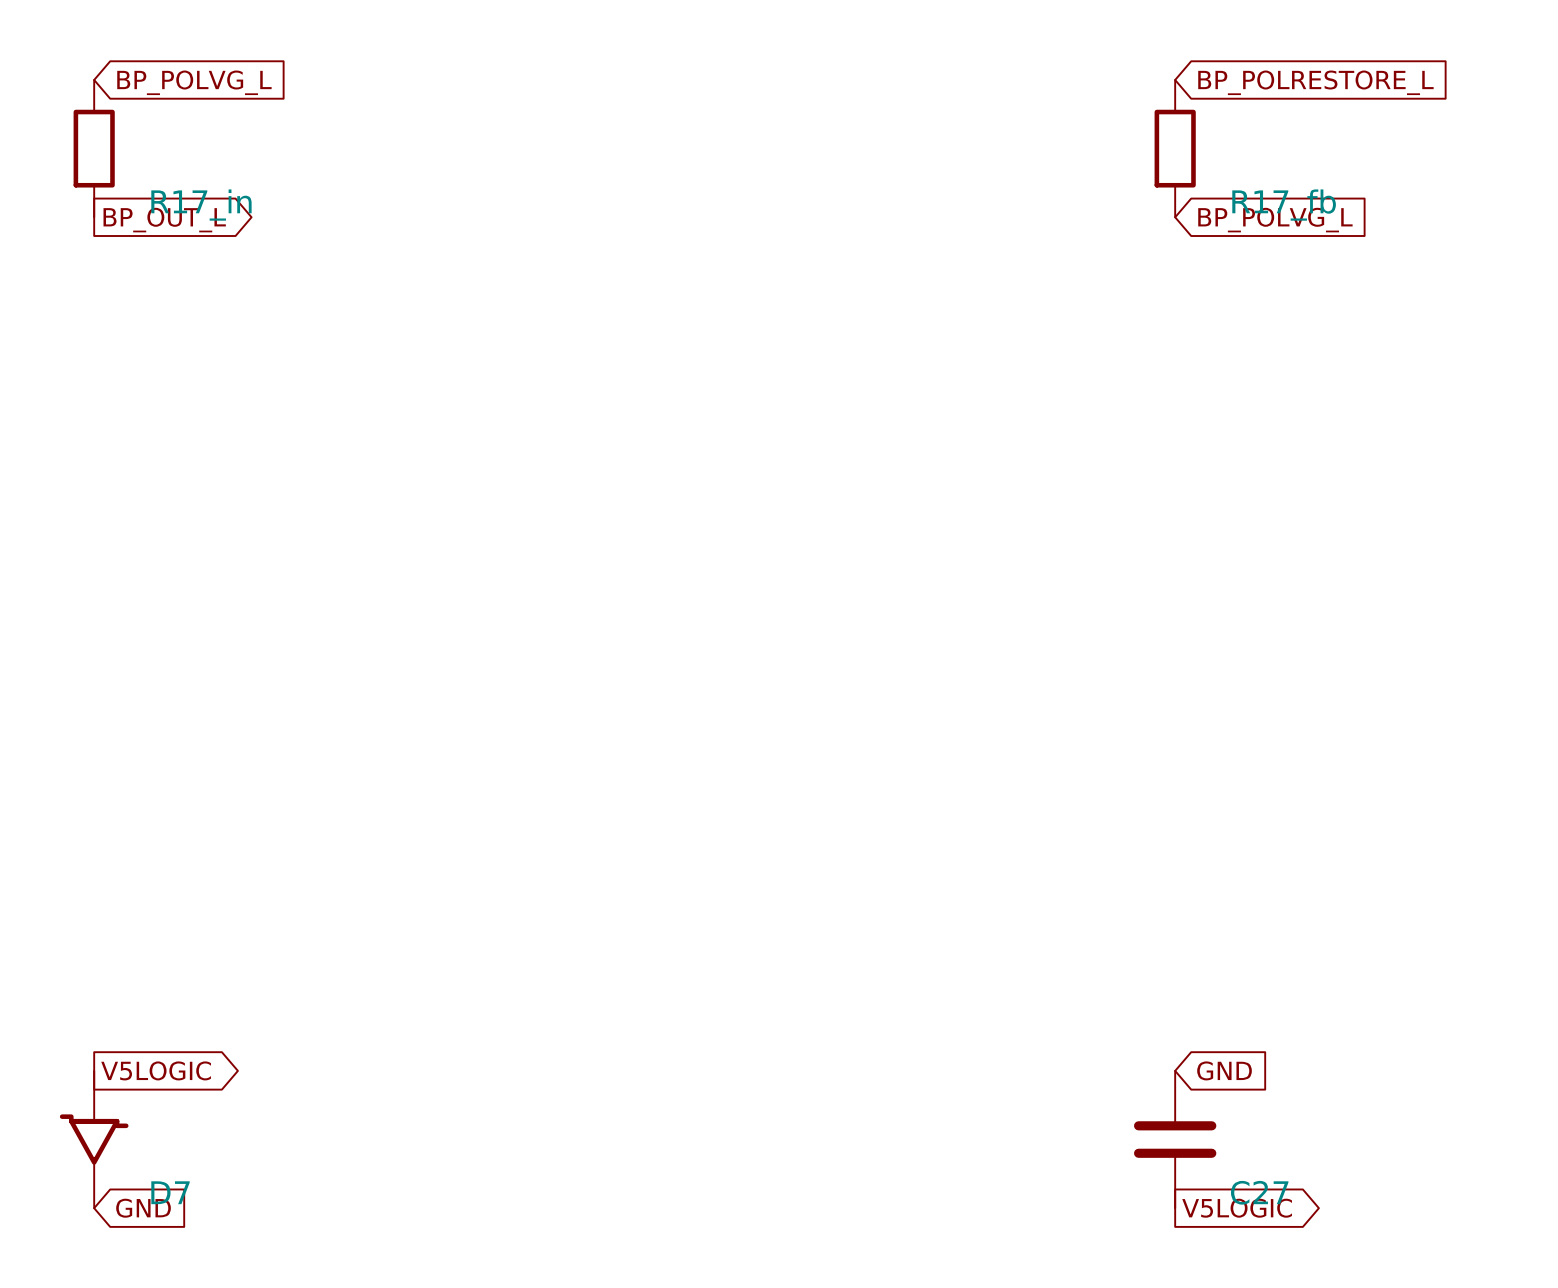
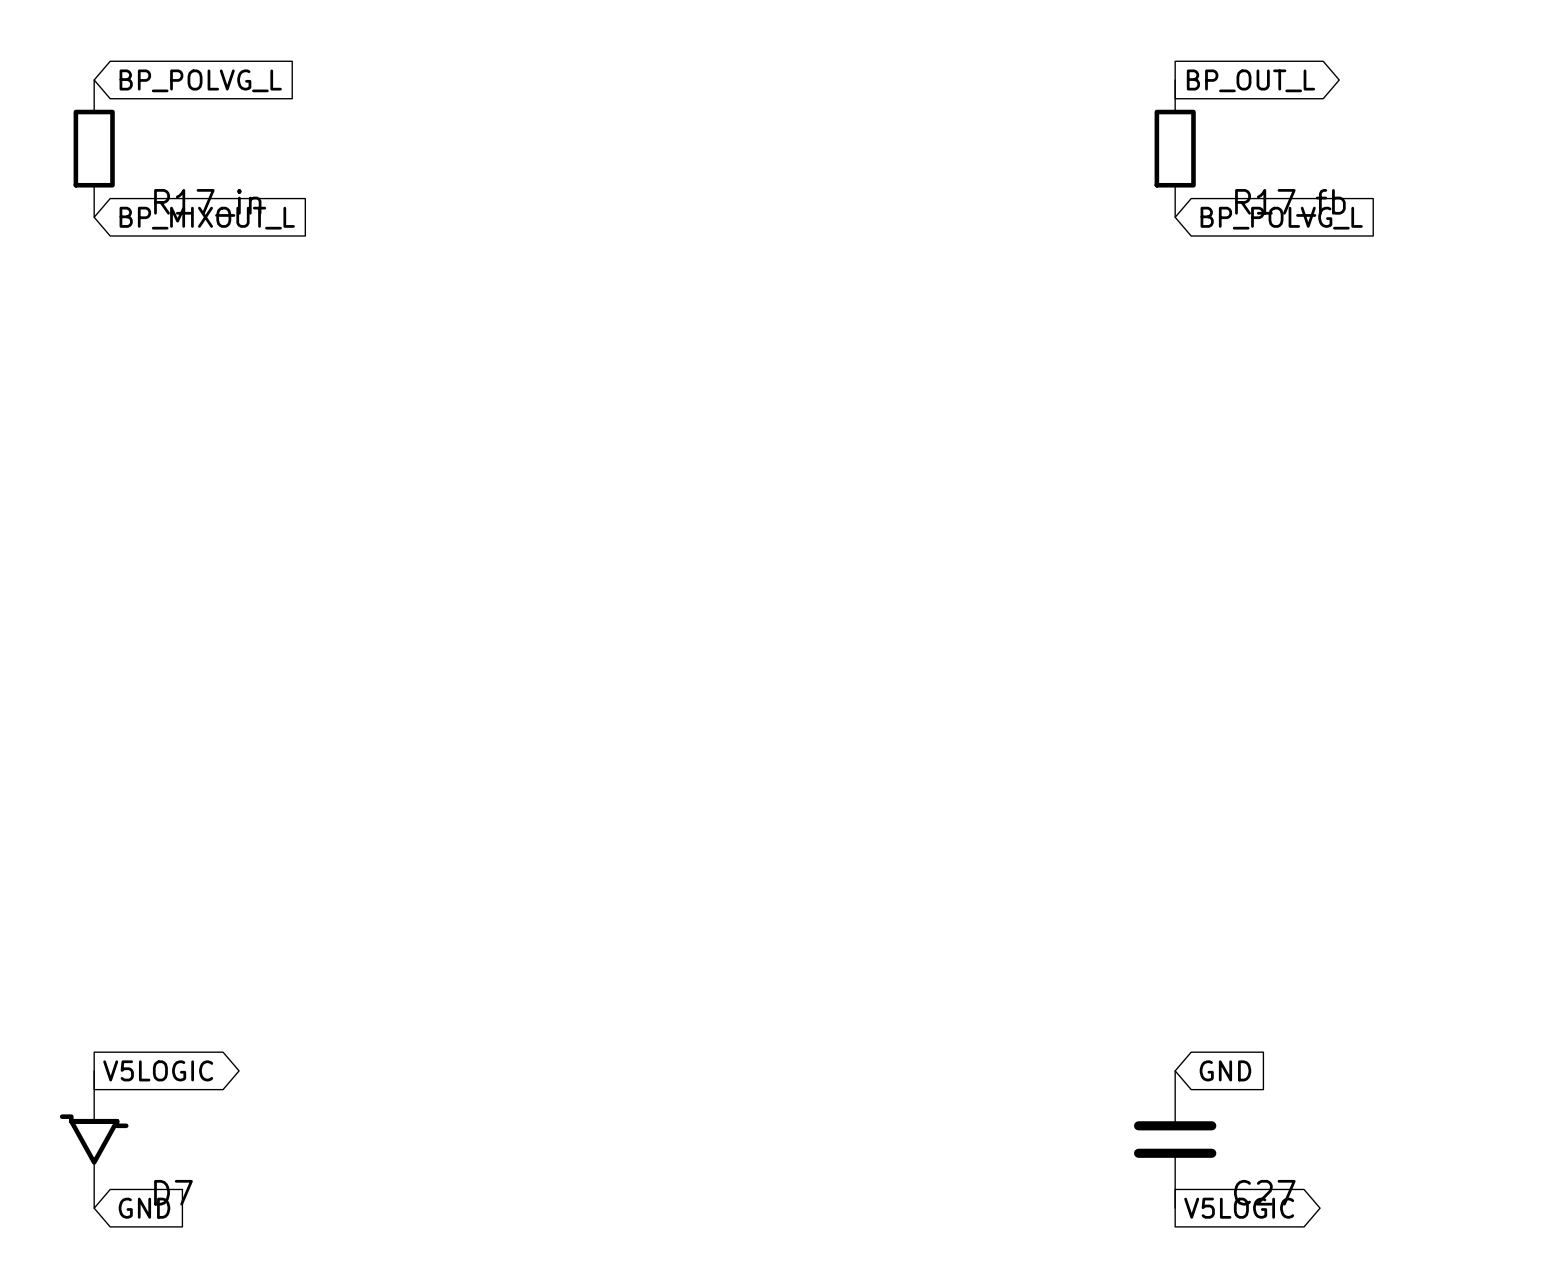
global label shape: input (1315, 82) -> output (1250, 80)
global label: BP_POLRESTORE_L (1315, 82) -> BP_OUT_L (1250, 80)
global label shape: output (164, 220) -> input (207, 218)
global label: BP_OUT_L (164, 220) -> BP_MIXOUT_L (207, 218)

